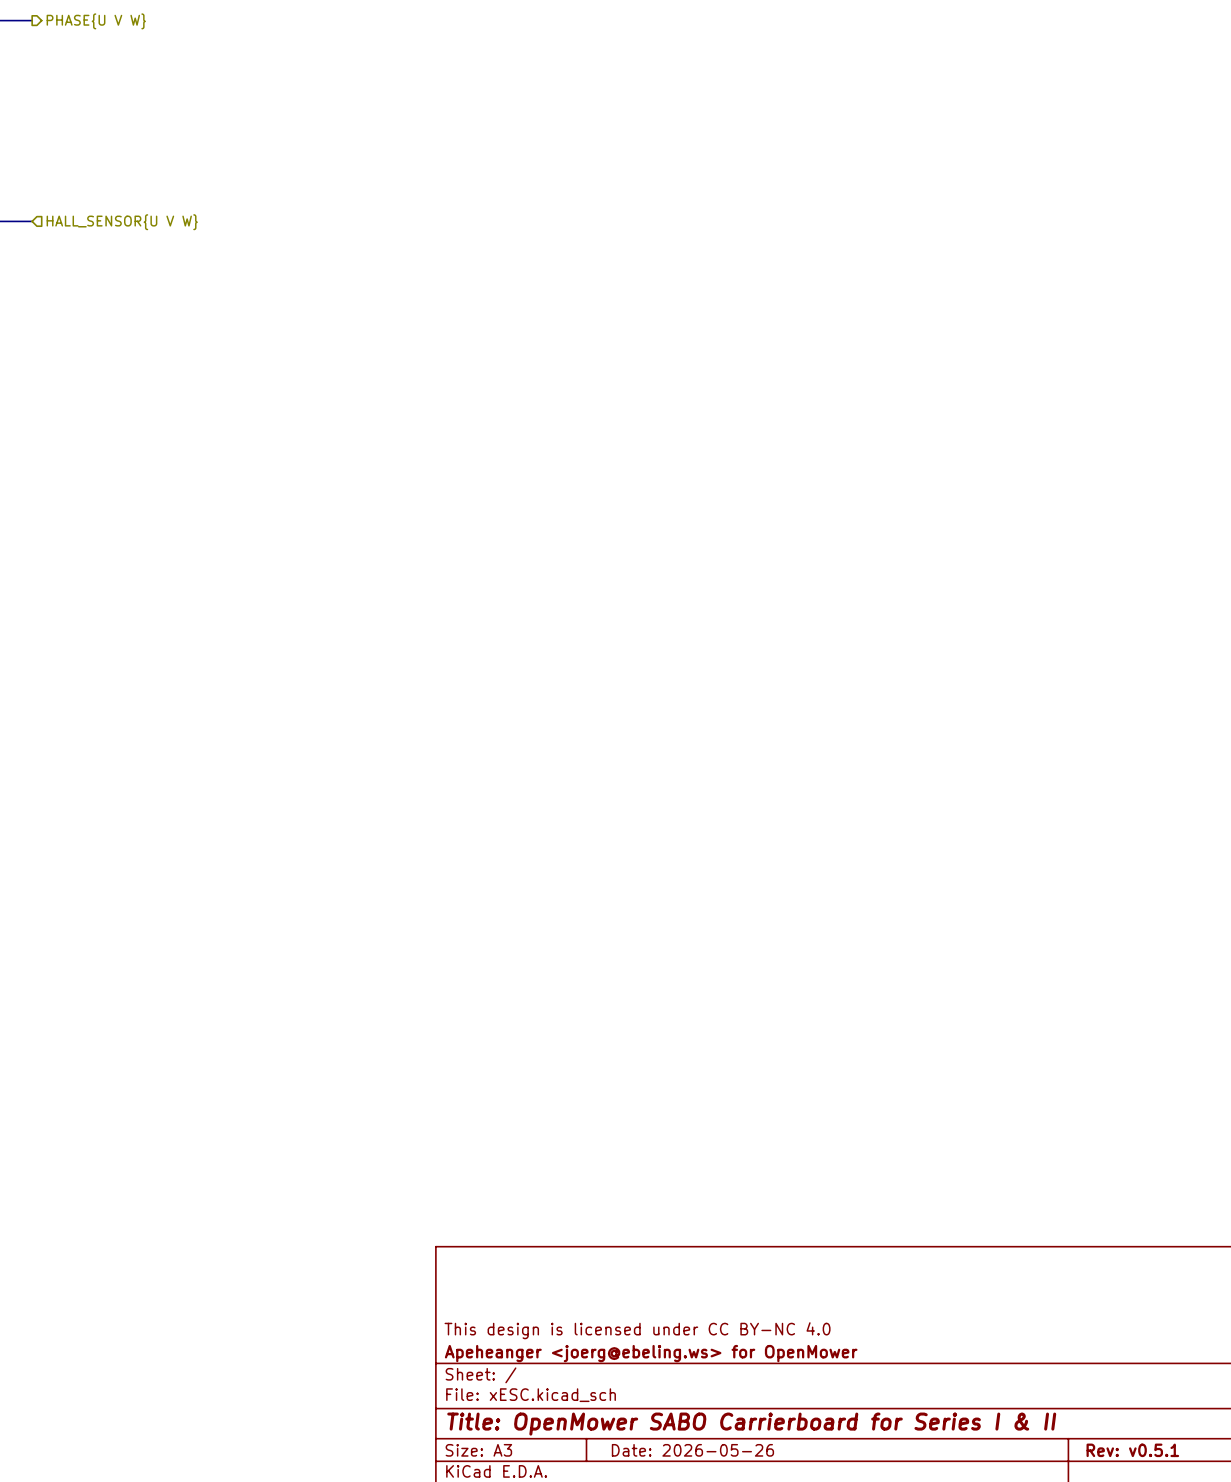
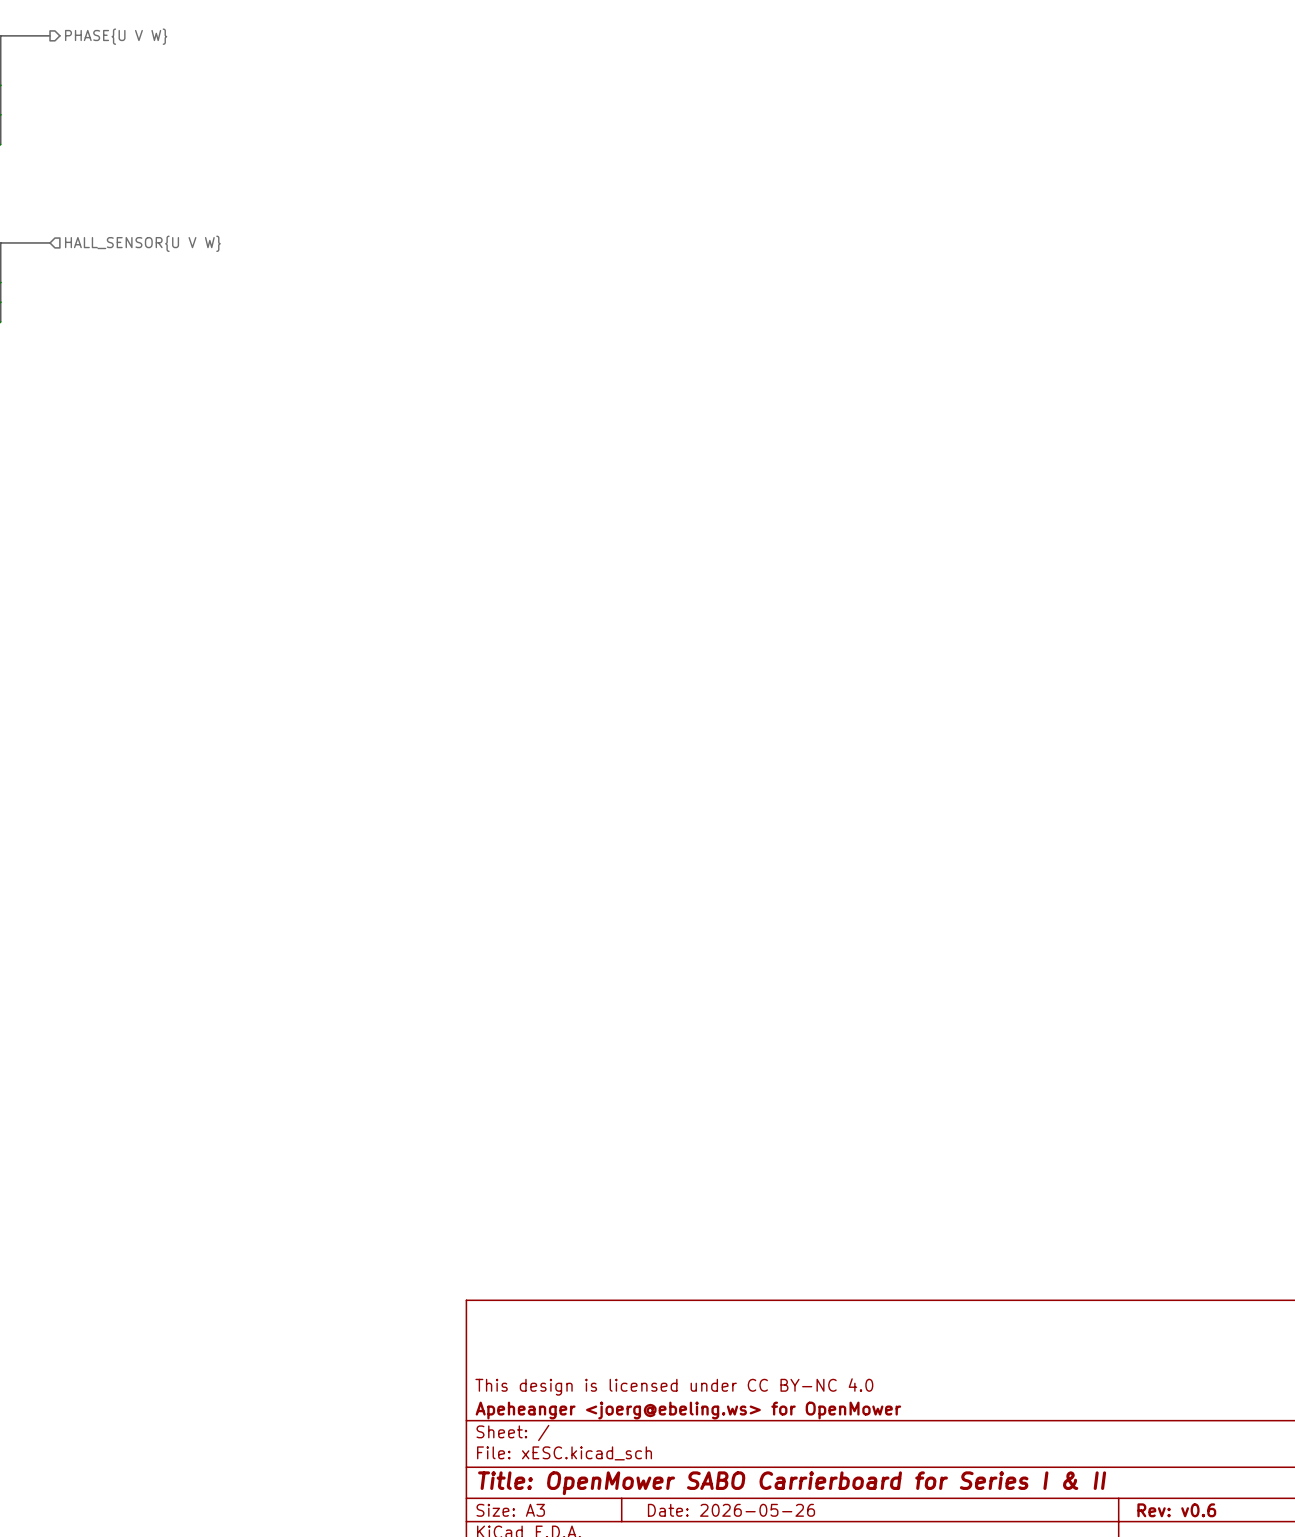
title block: Rev: v0.5.1 (1132, 1450) -> Rev: v0.6 (1176, 1510)

